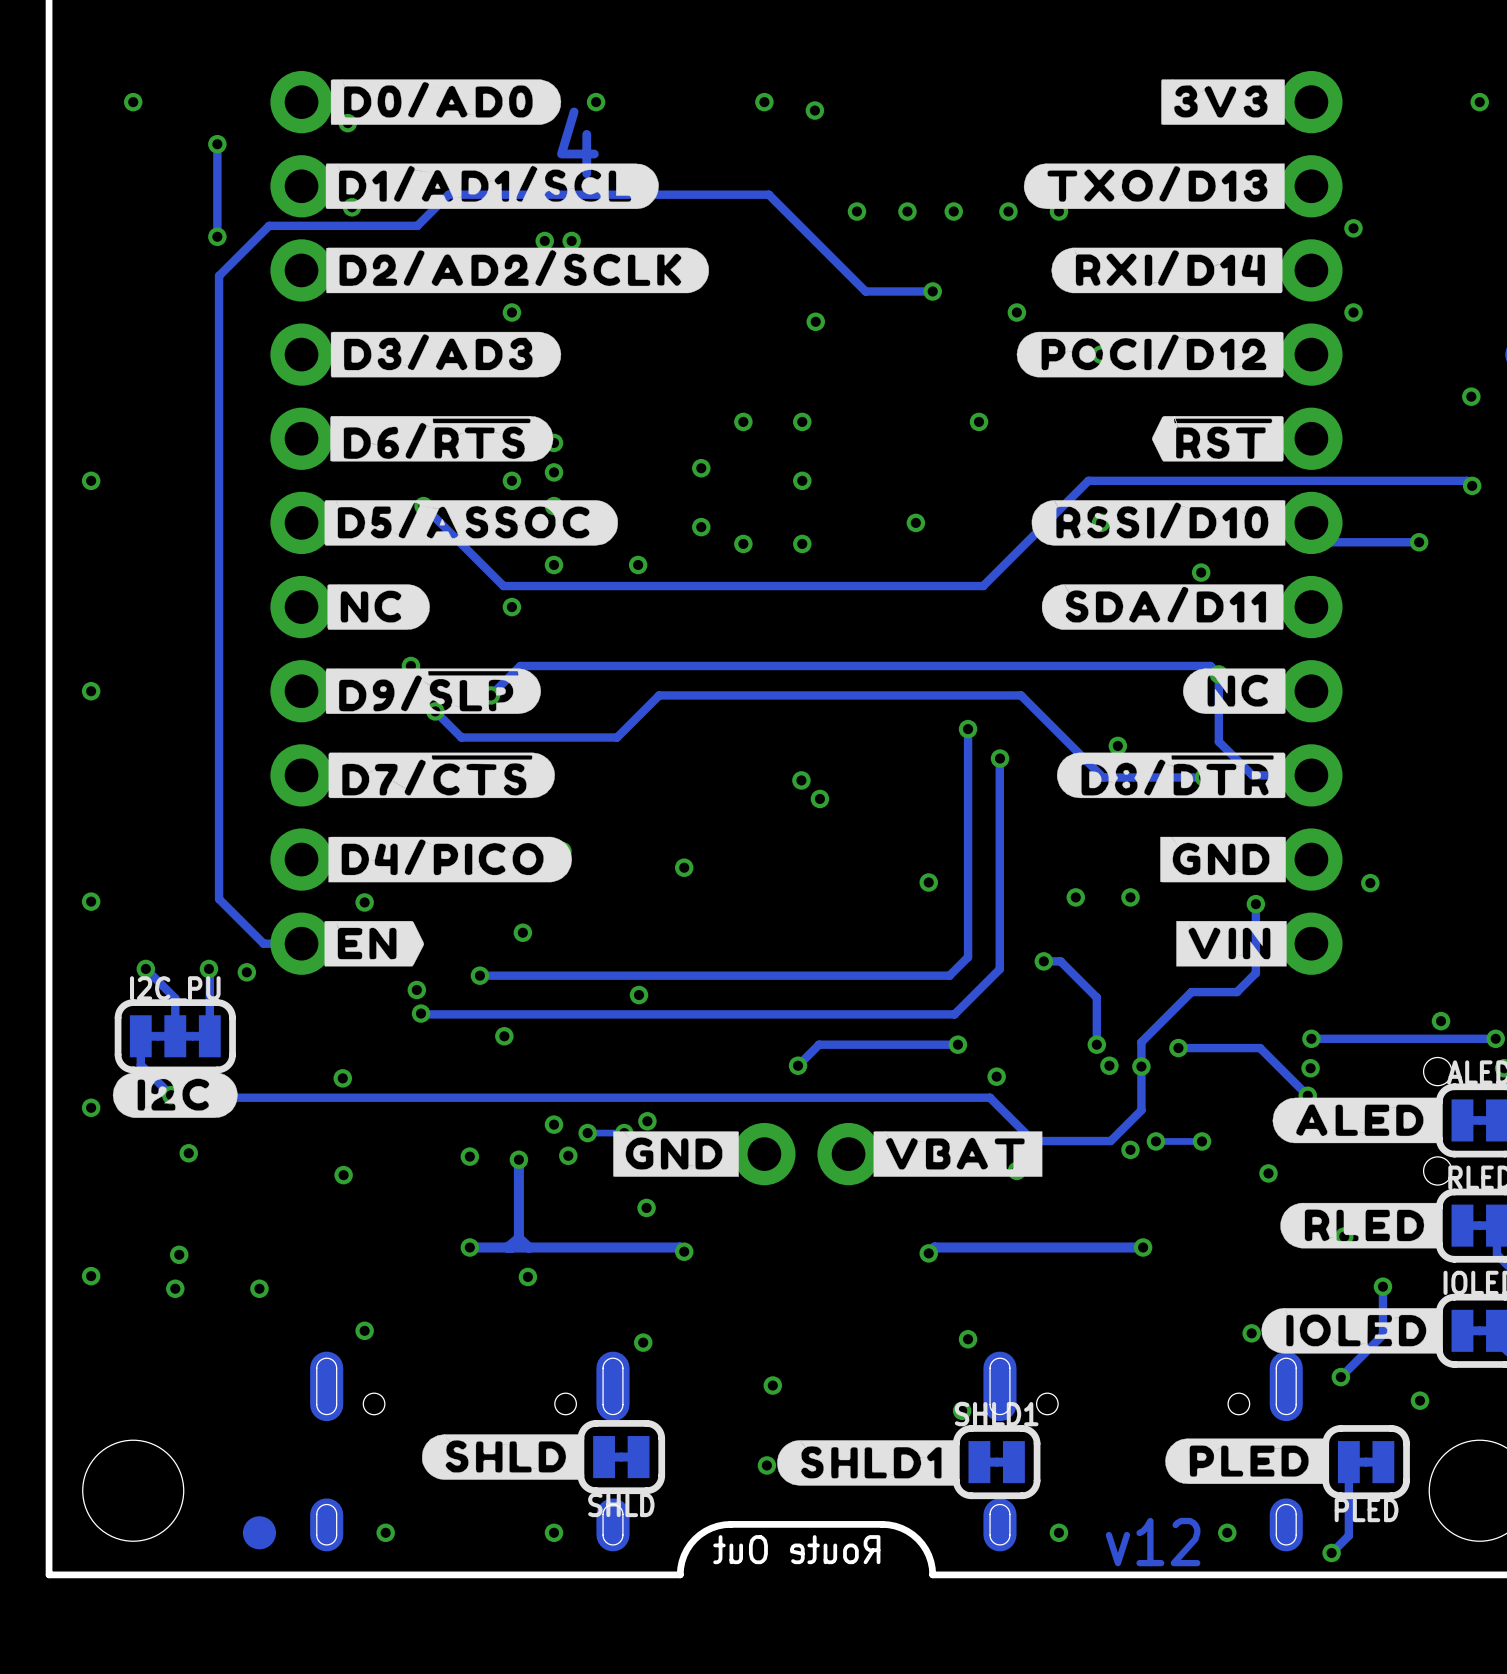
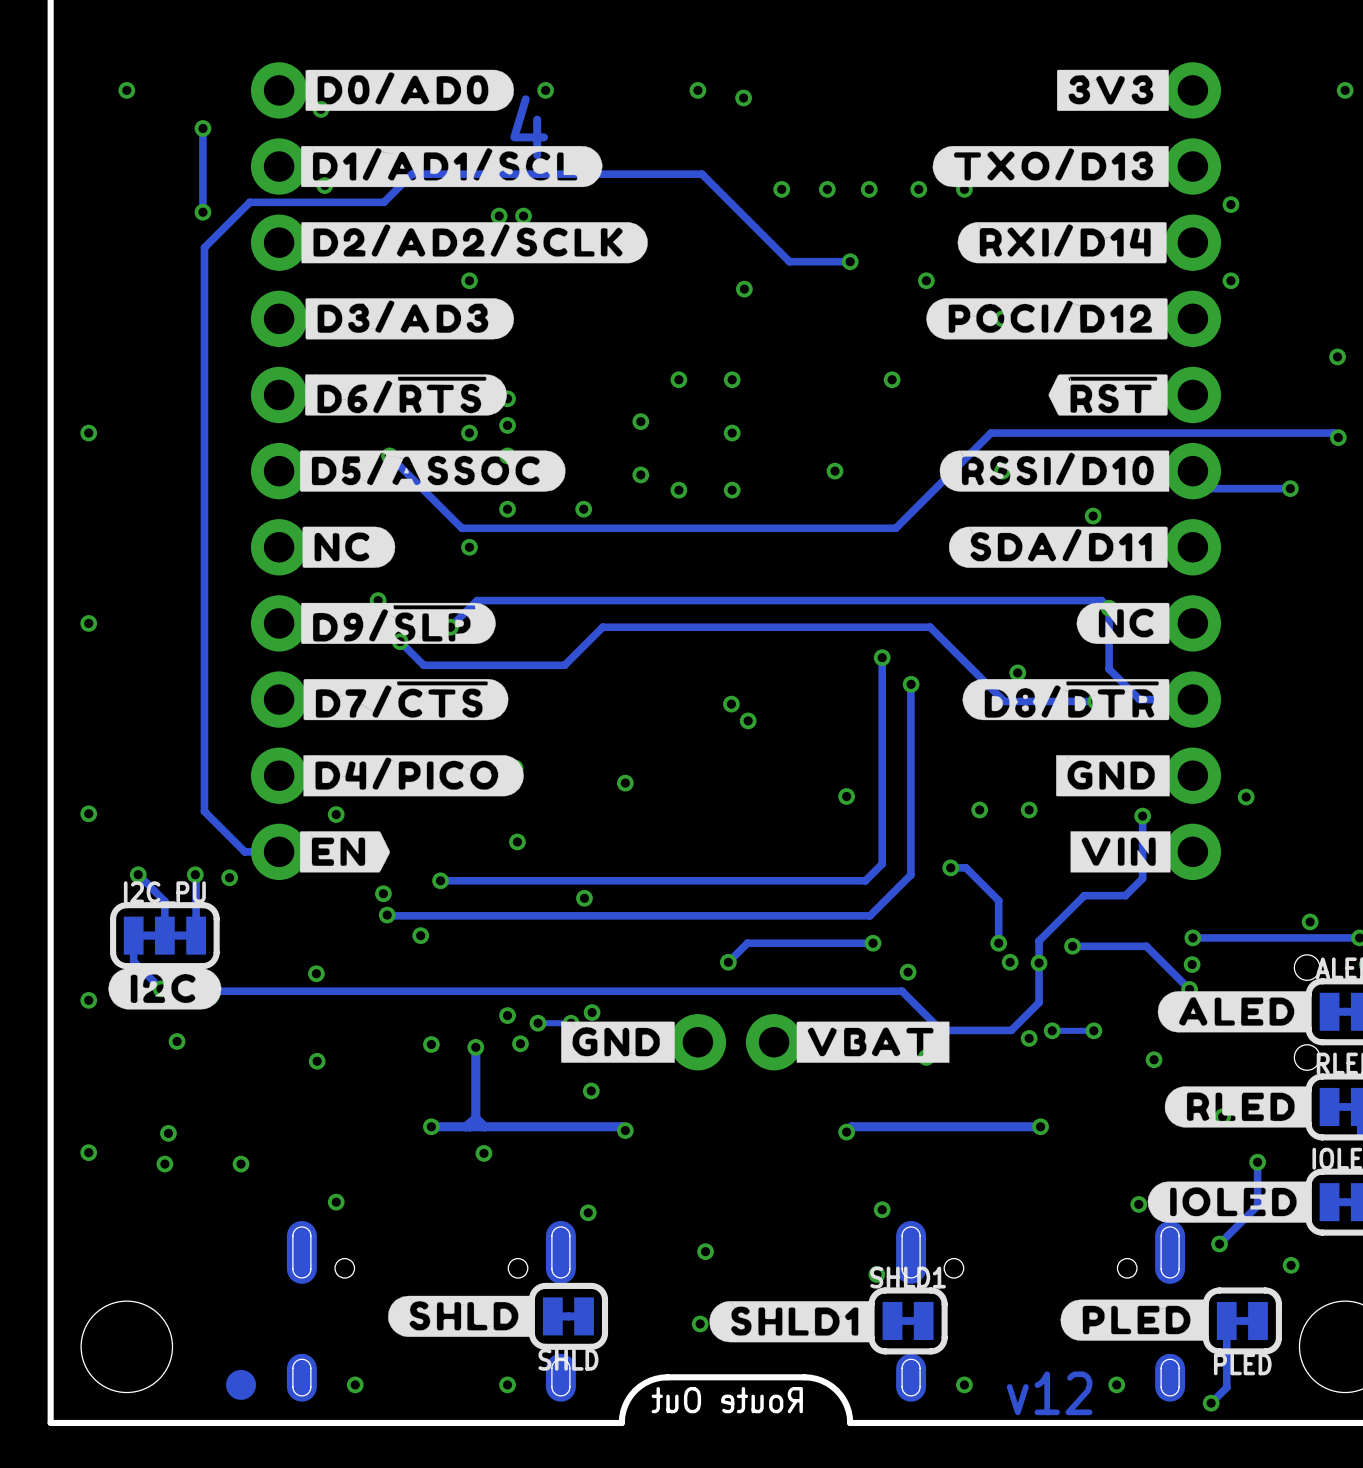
via position: (522, 932) -> (517, 841)
via position: (504, 1036) -> (420, 935)

